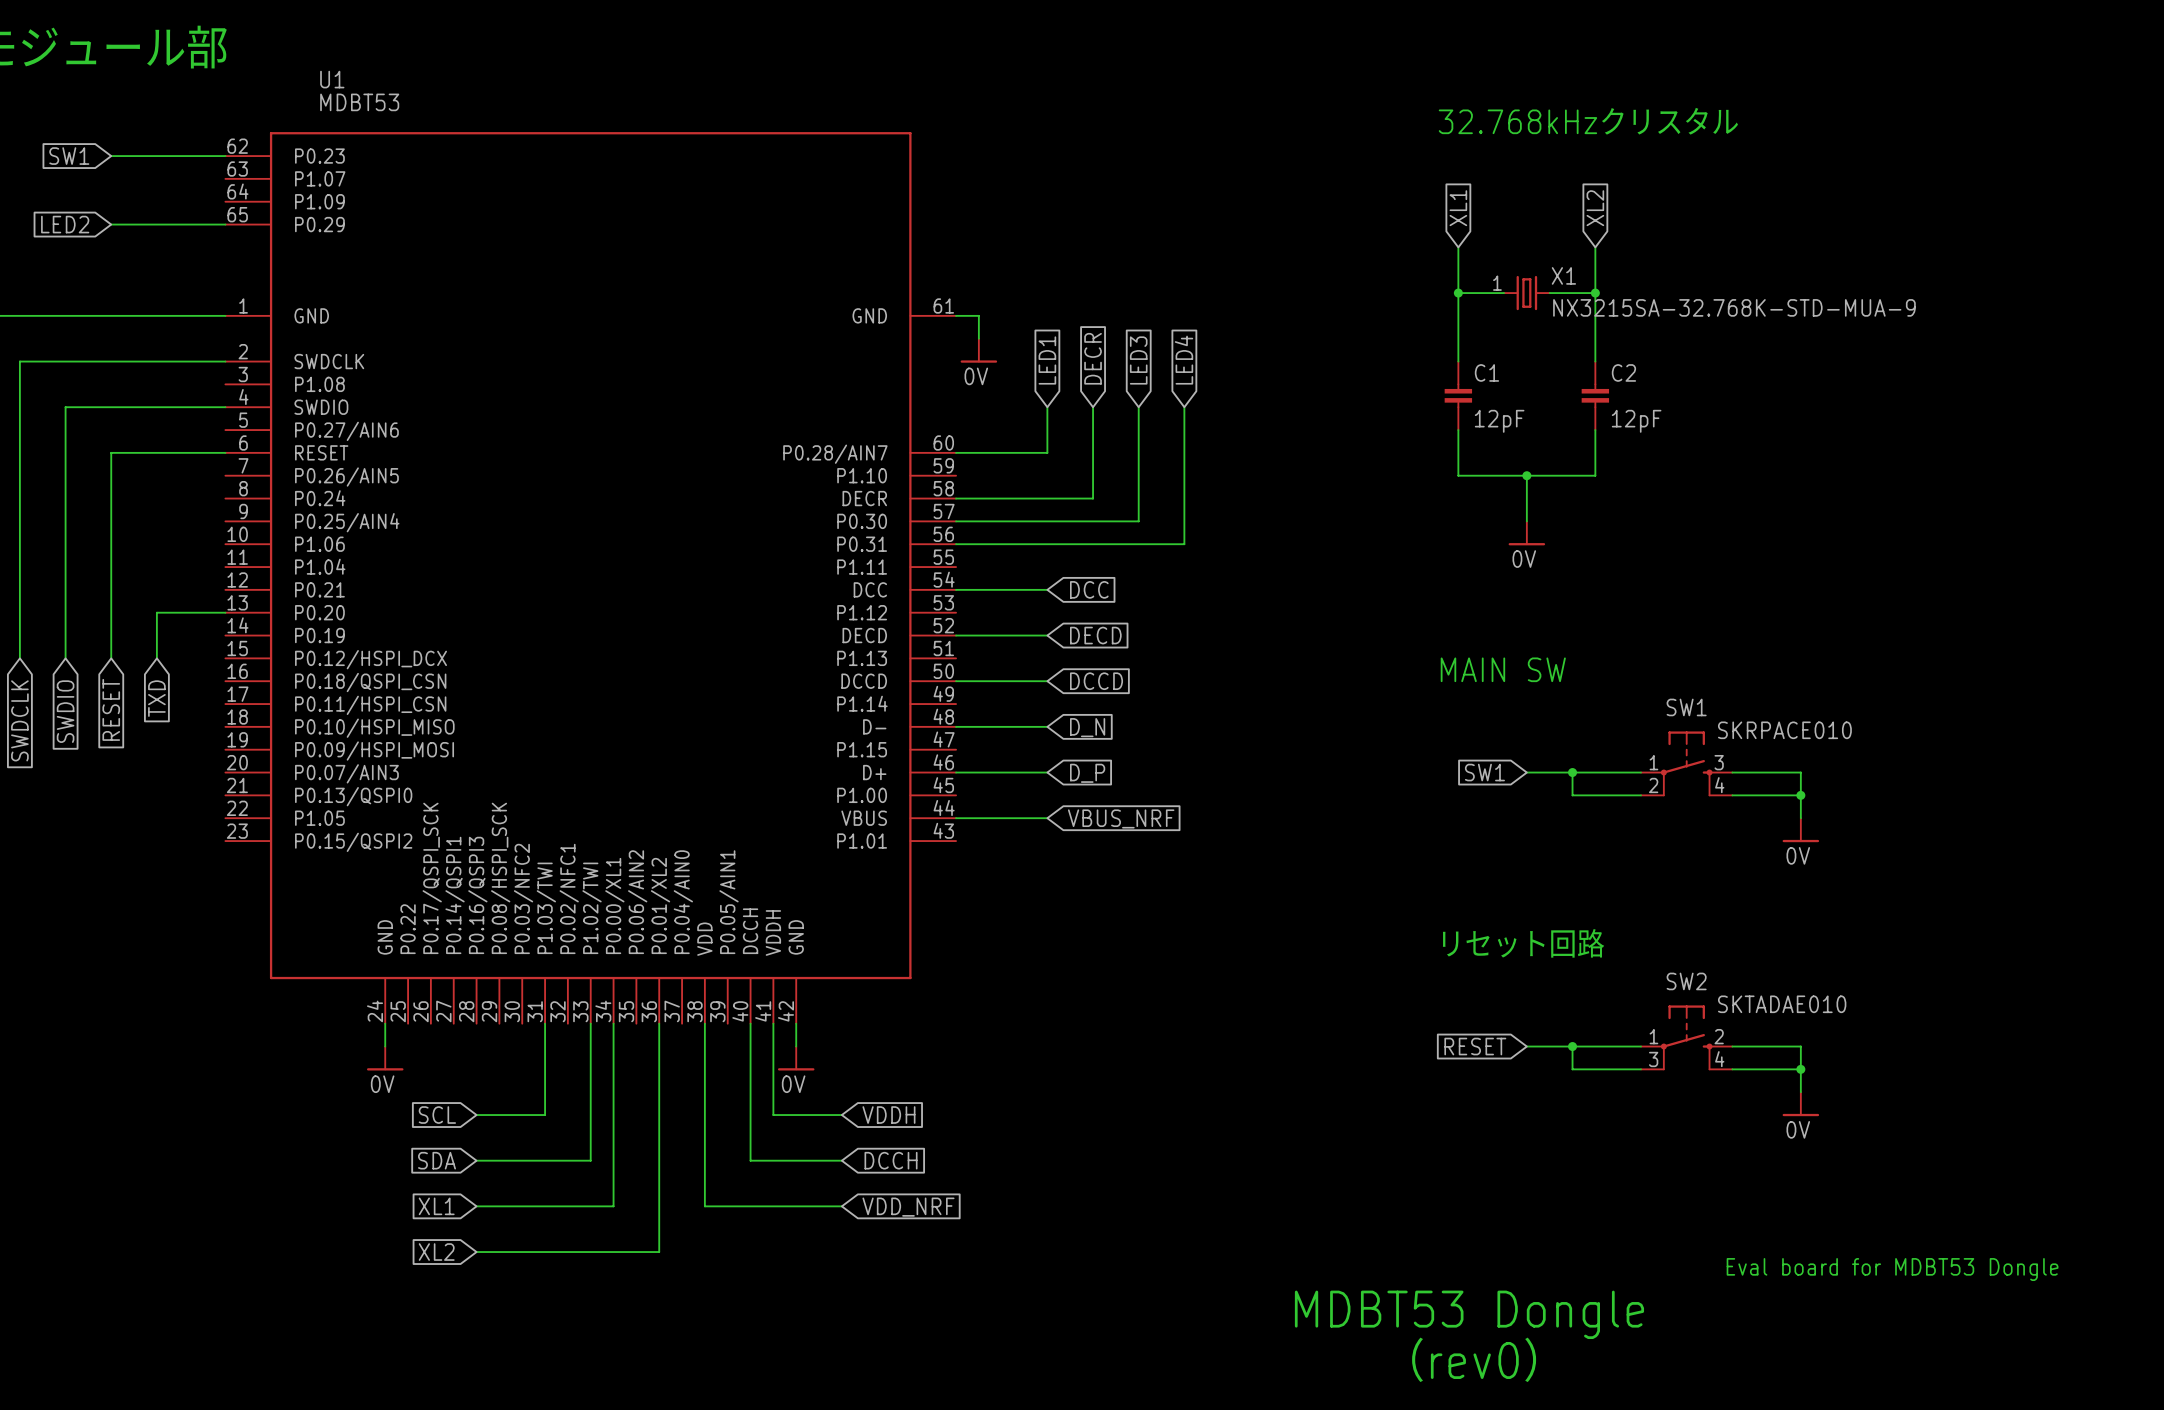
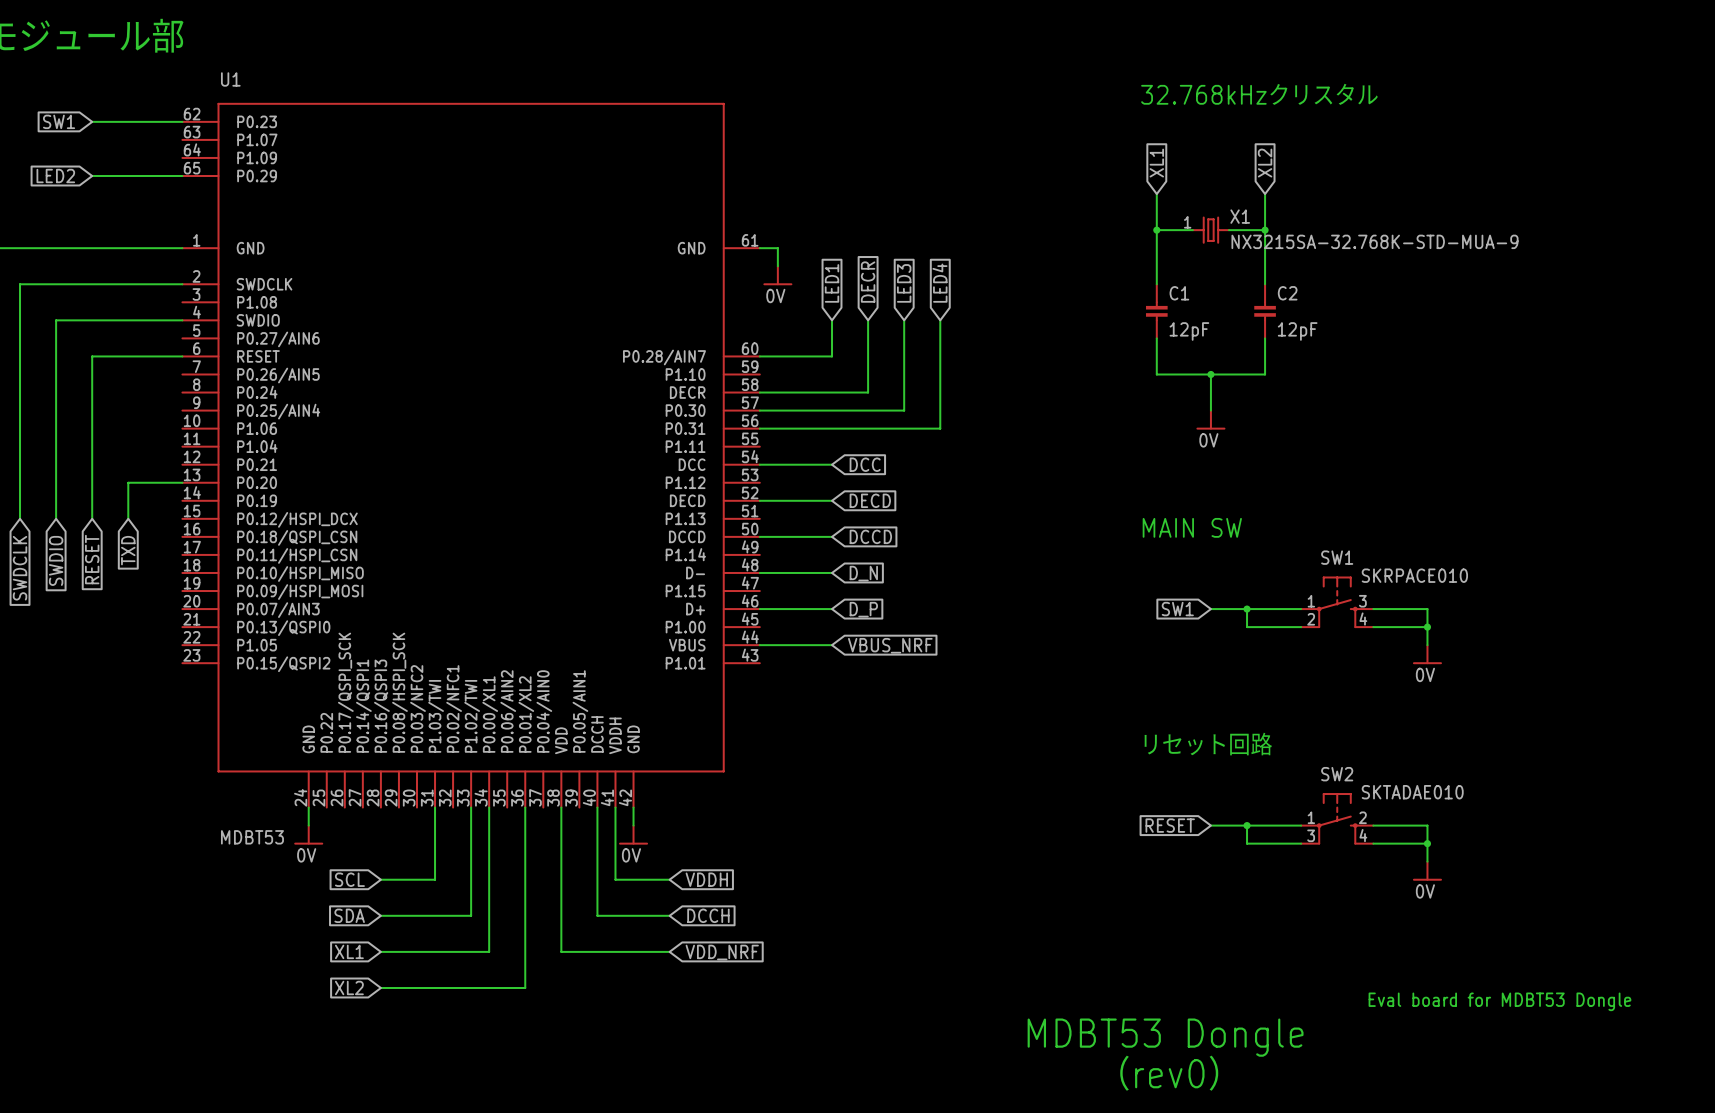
U1 name position: U1 (332, 79) -> U1 (230, 79)
U1 value position: MDBT53 (359, 102) -> MDBT53 (252, 837)

